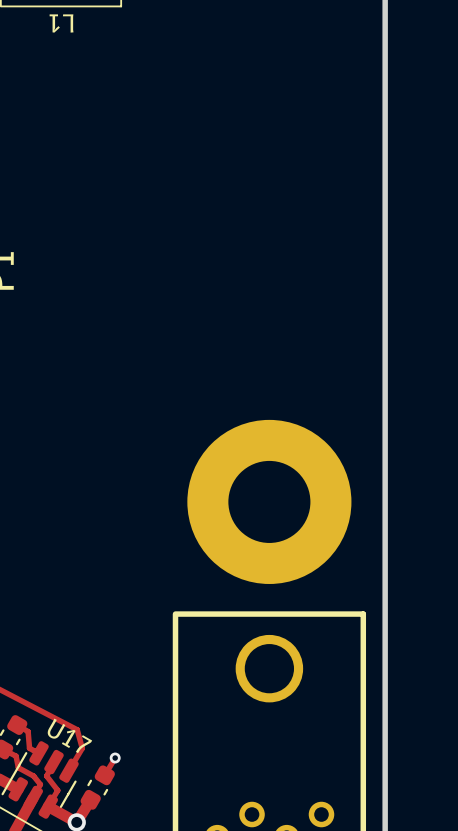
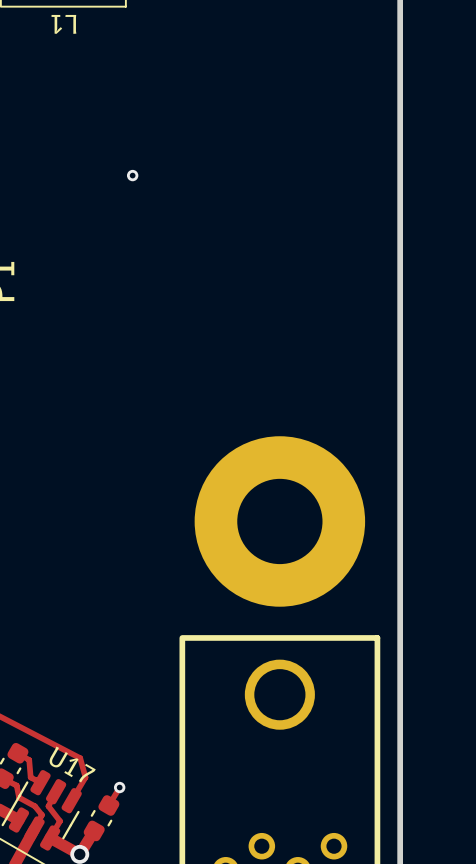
via: none -> (132, 175)

